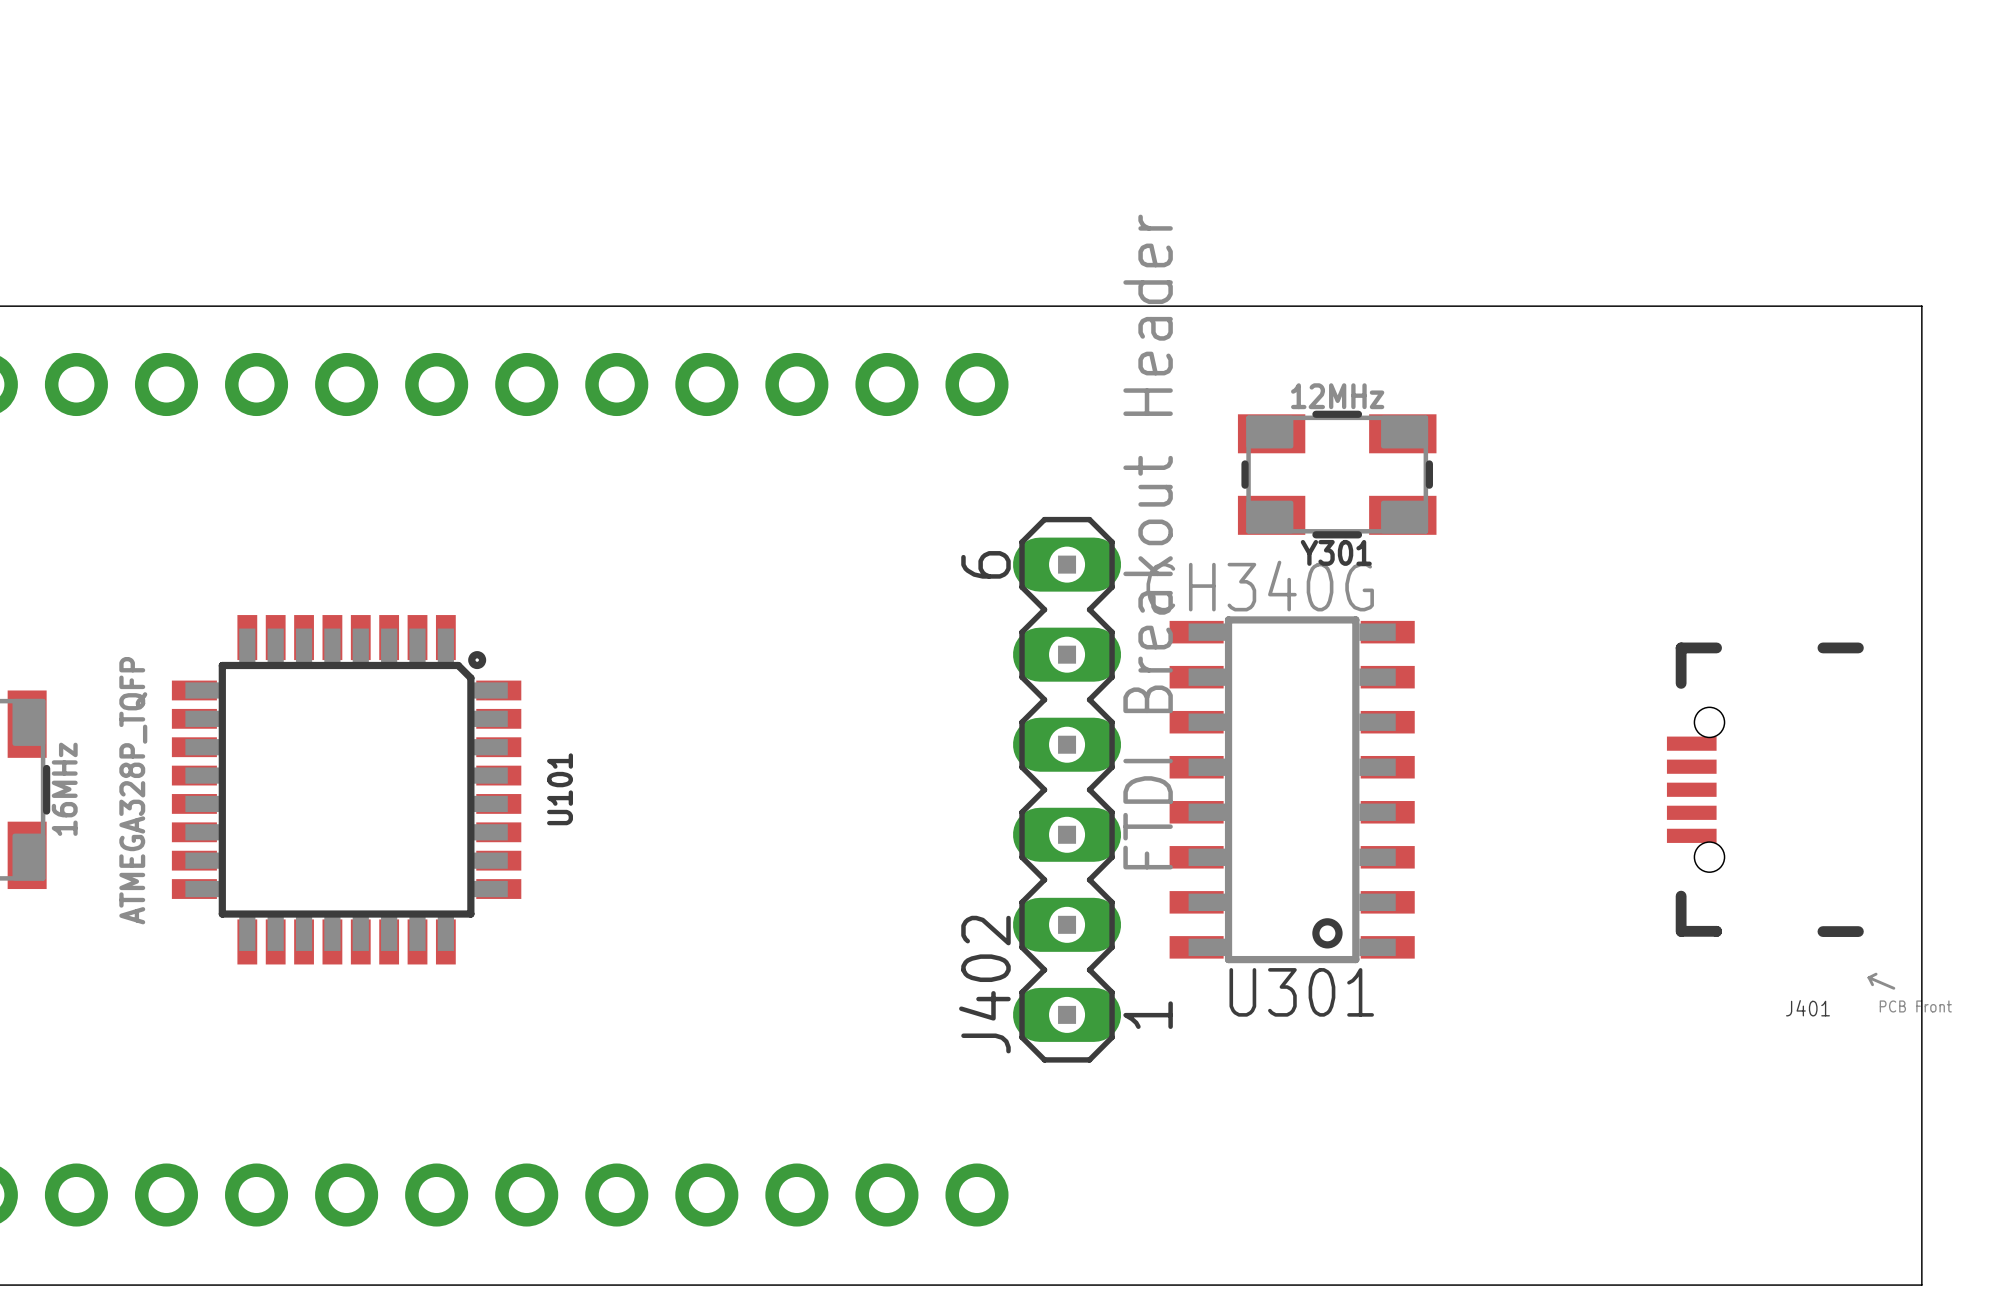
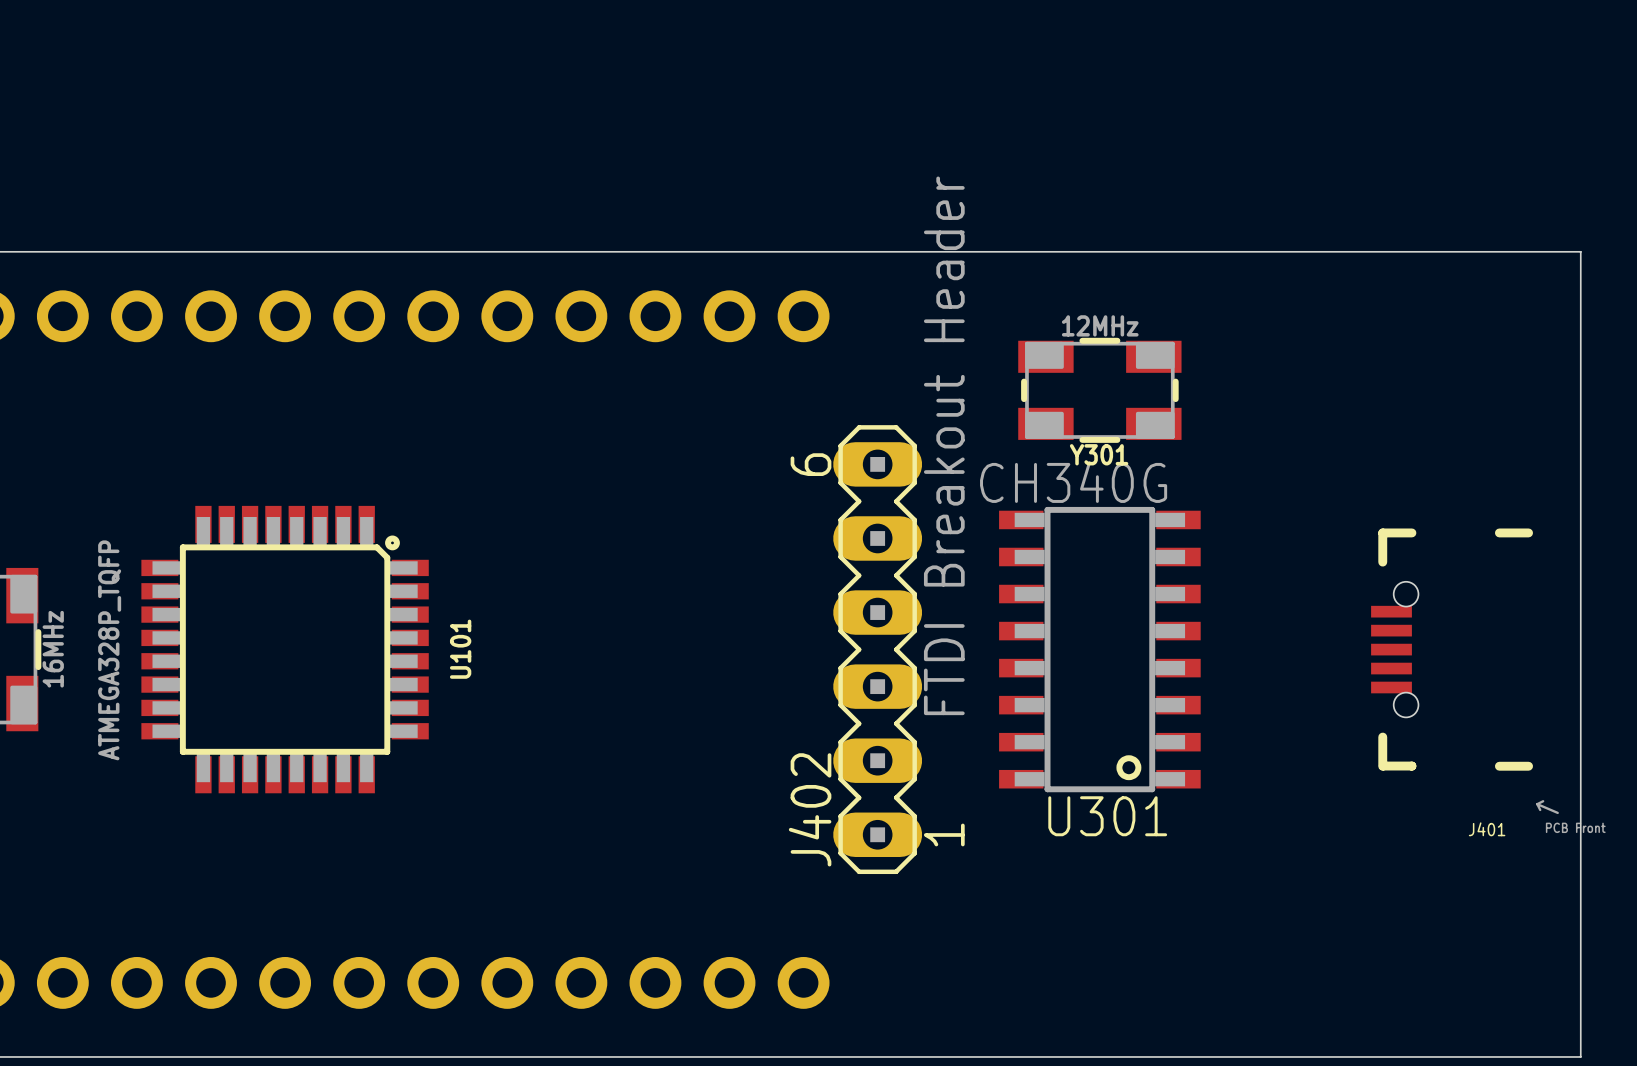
U301 position: (1292, 789) -> (1099, 649)

